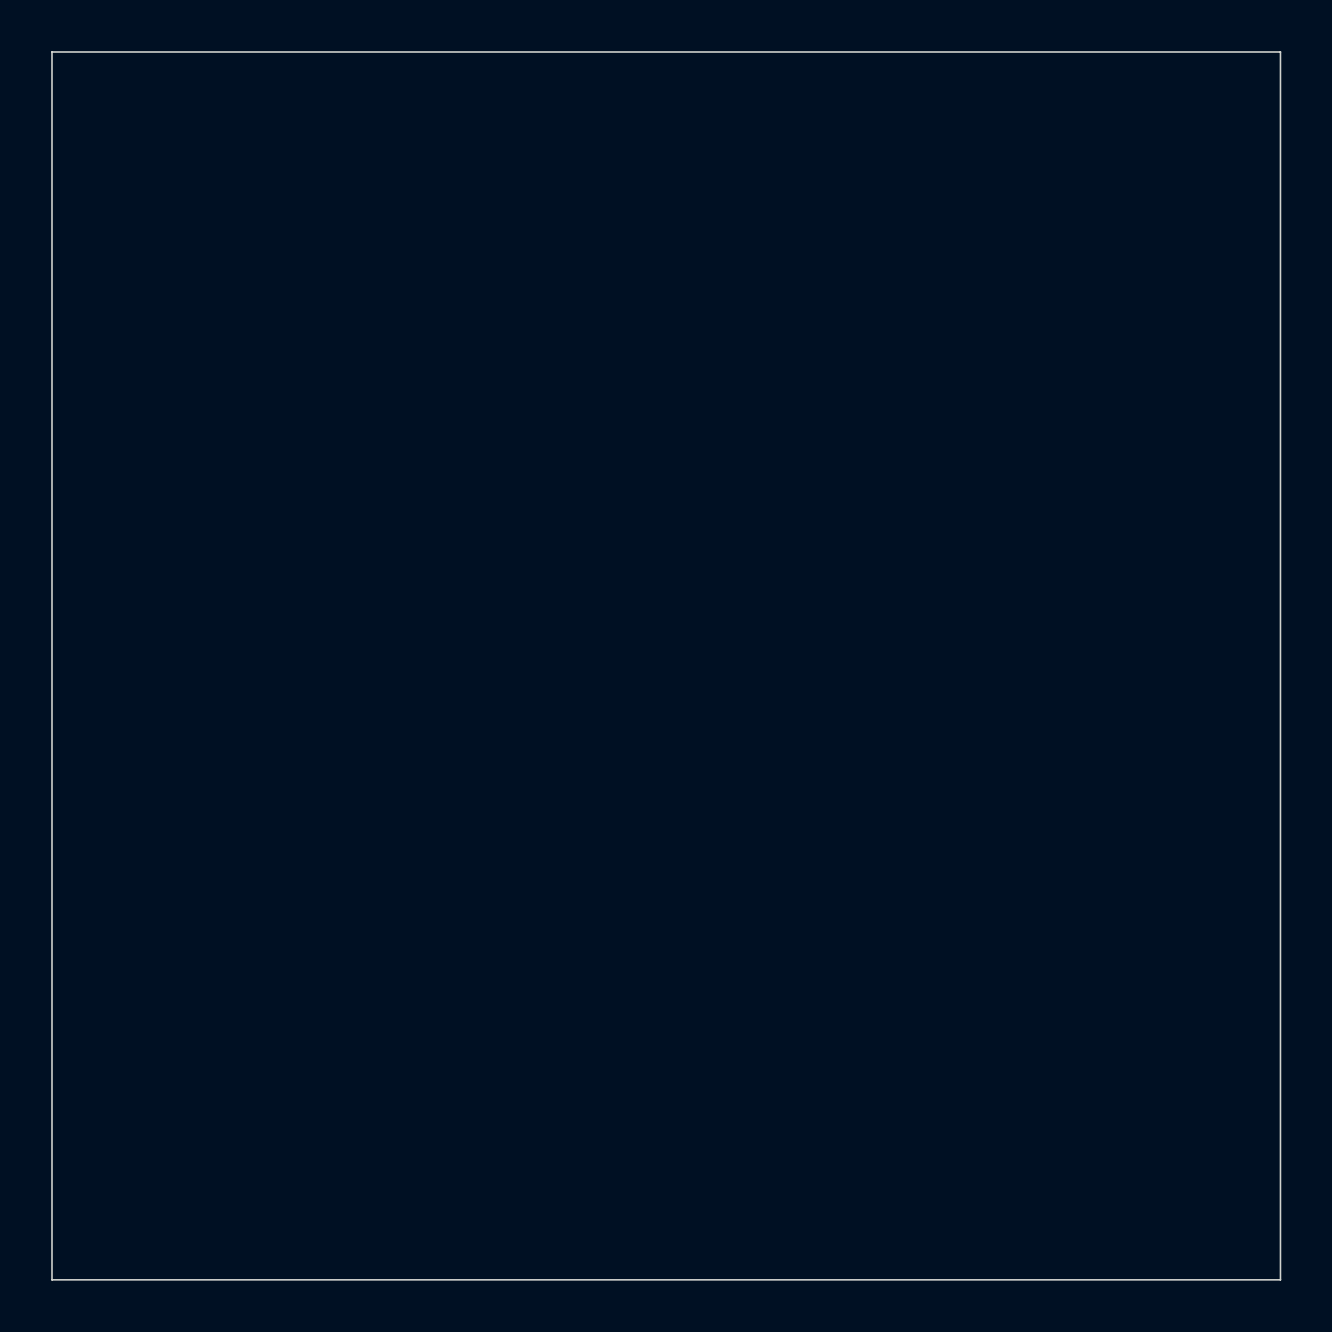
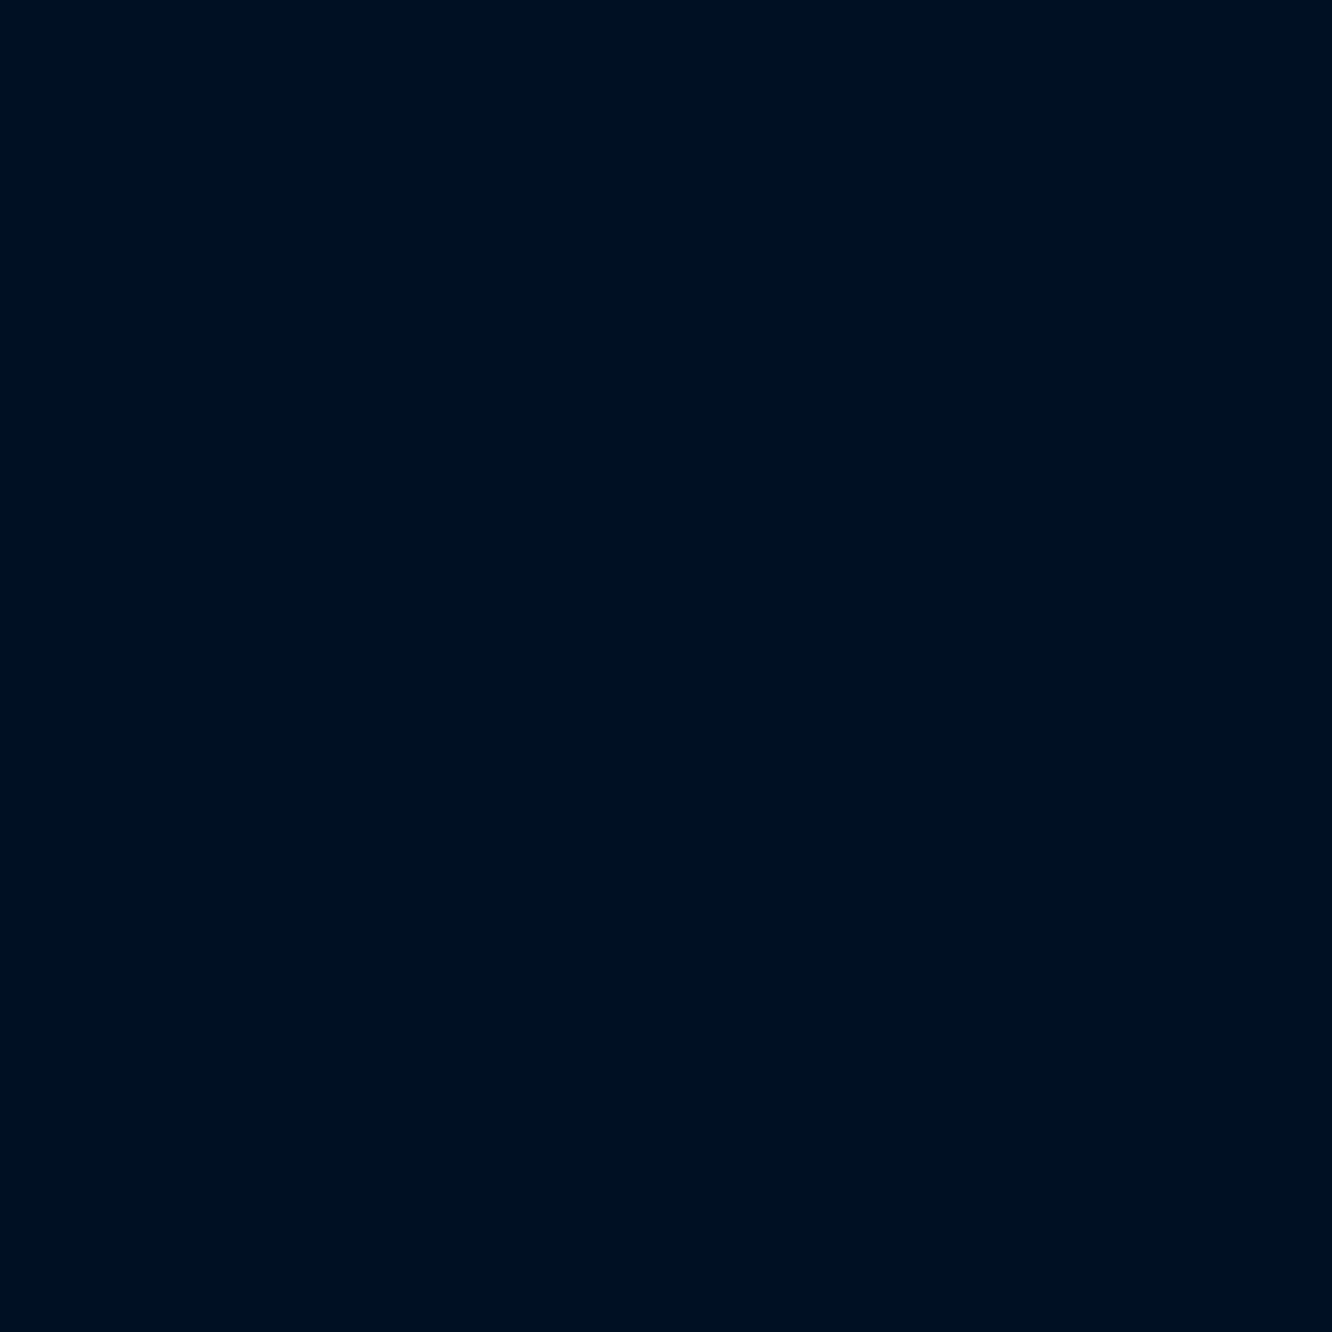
board edge: (1280, 51) (1280, 1279) (51, 1279) (51, 51) (1280, 51) -> none

